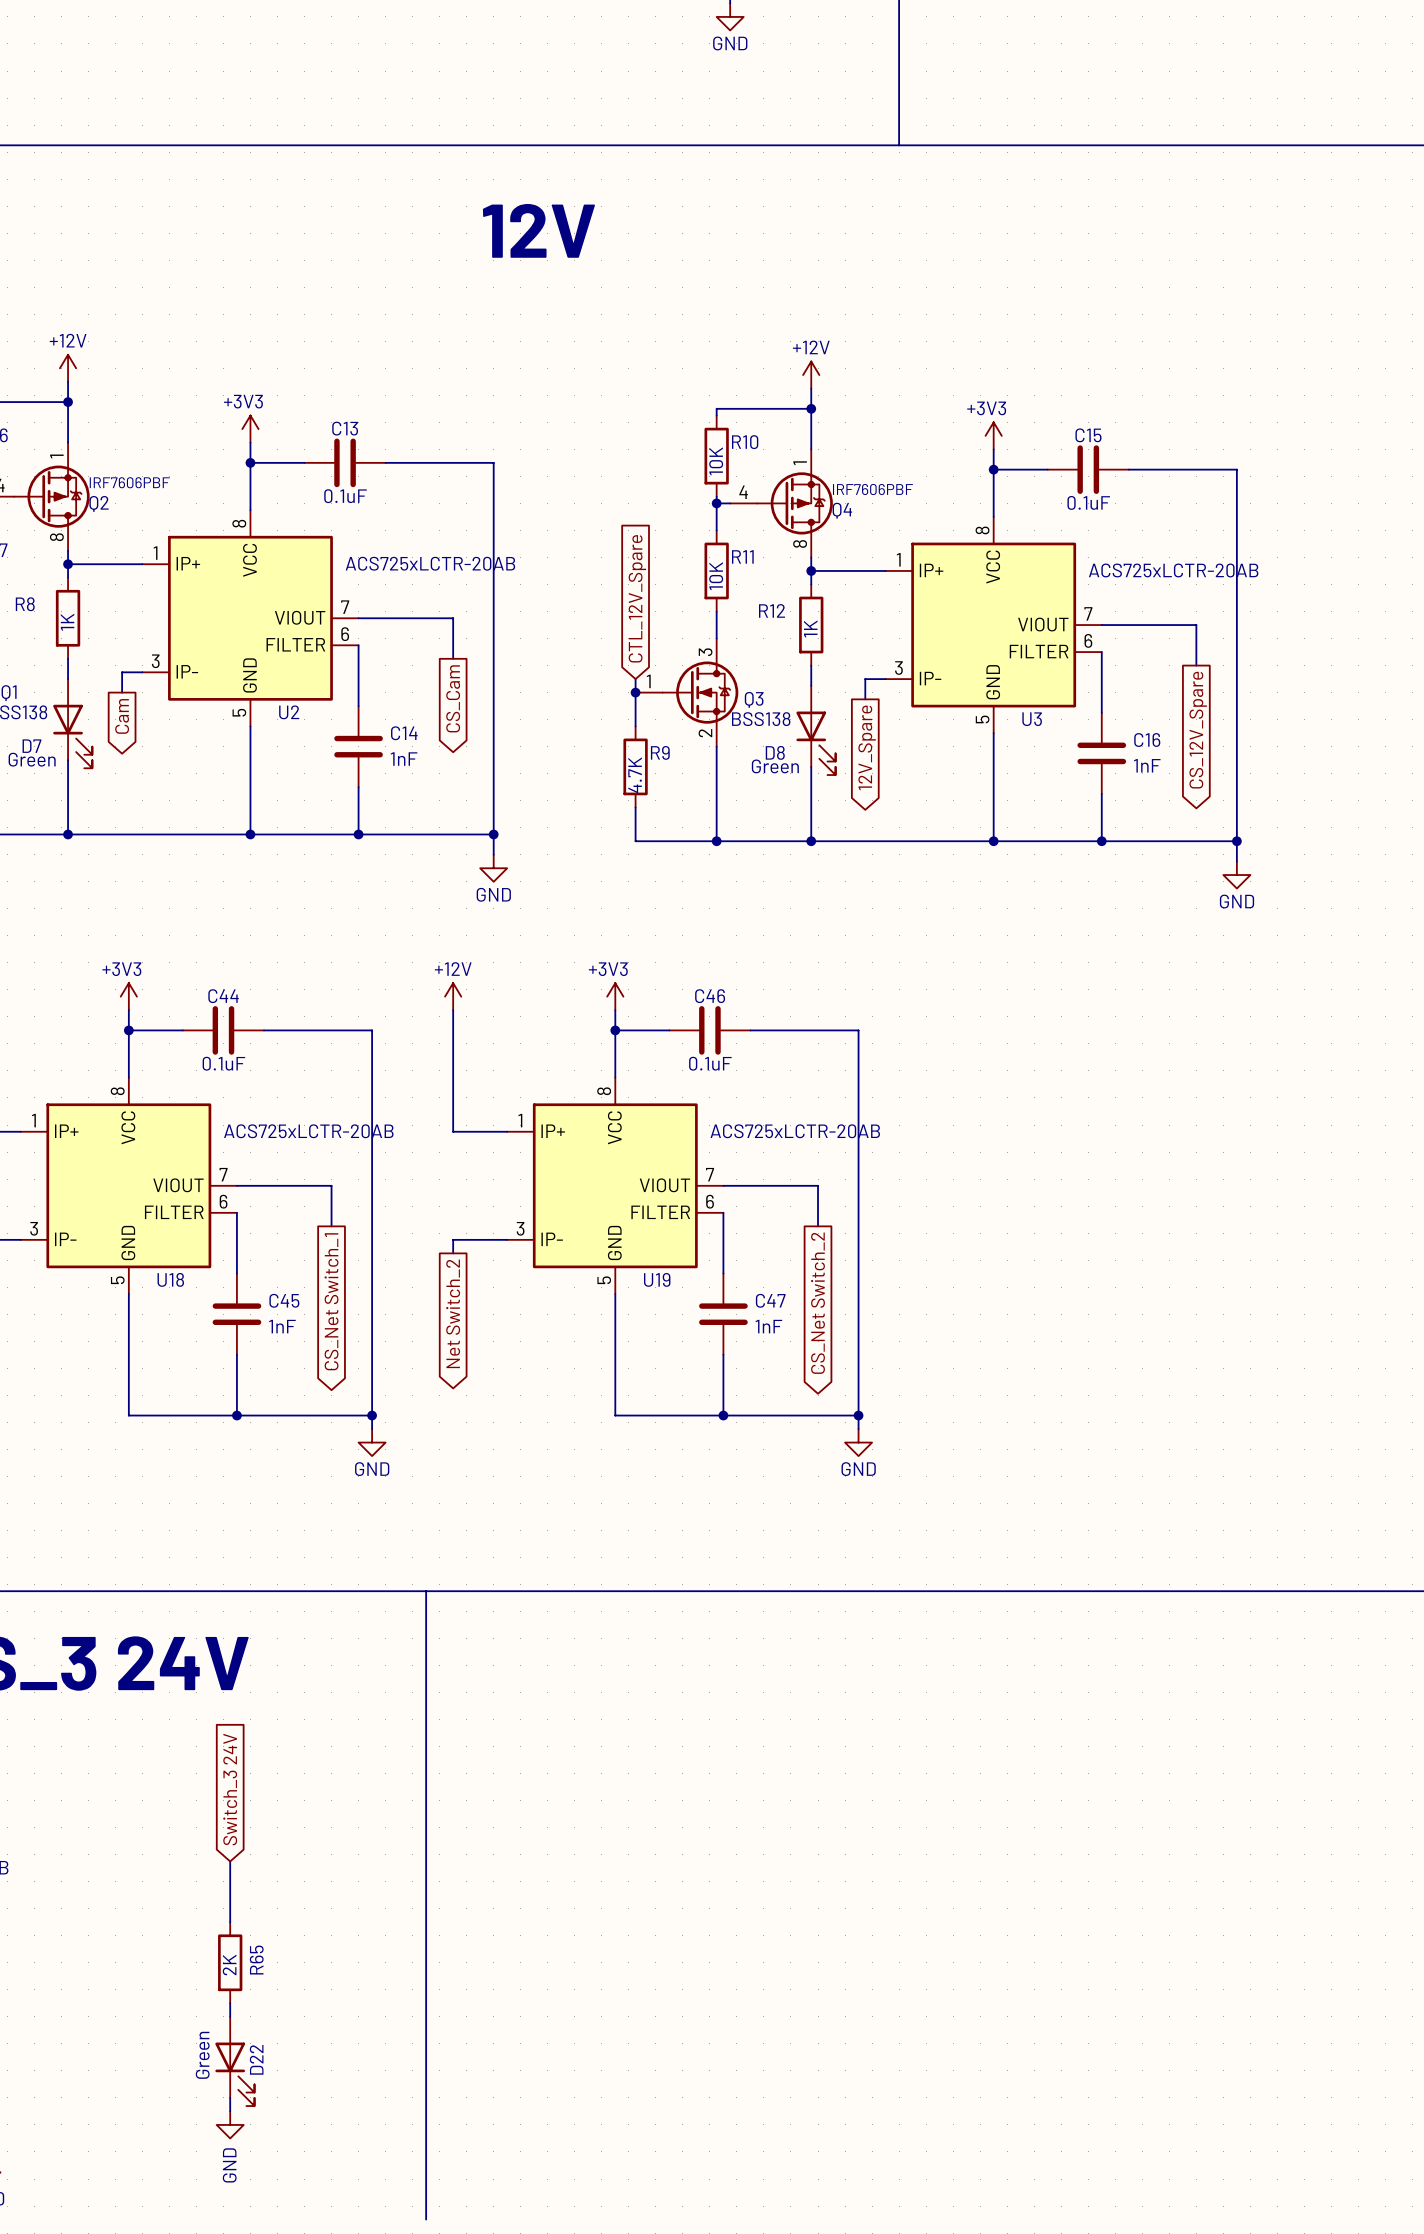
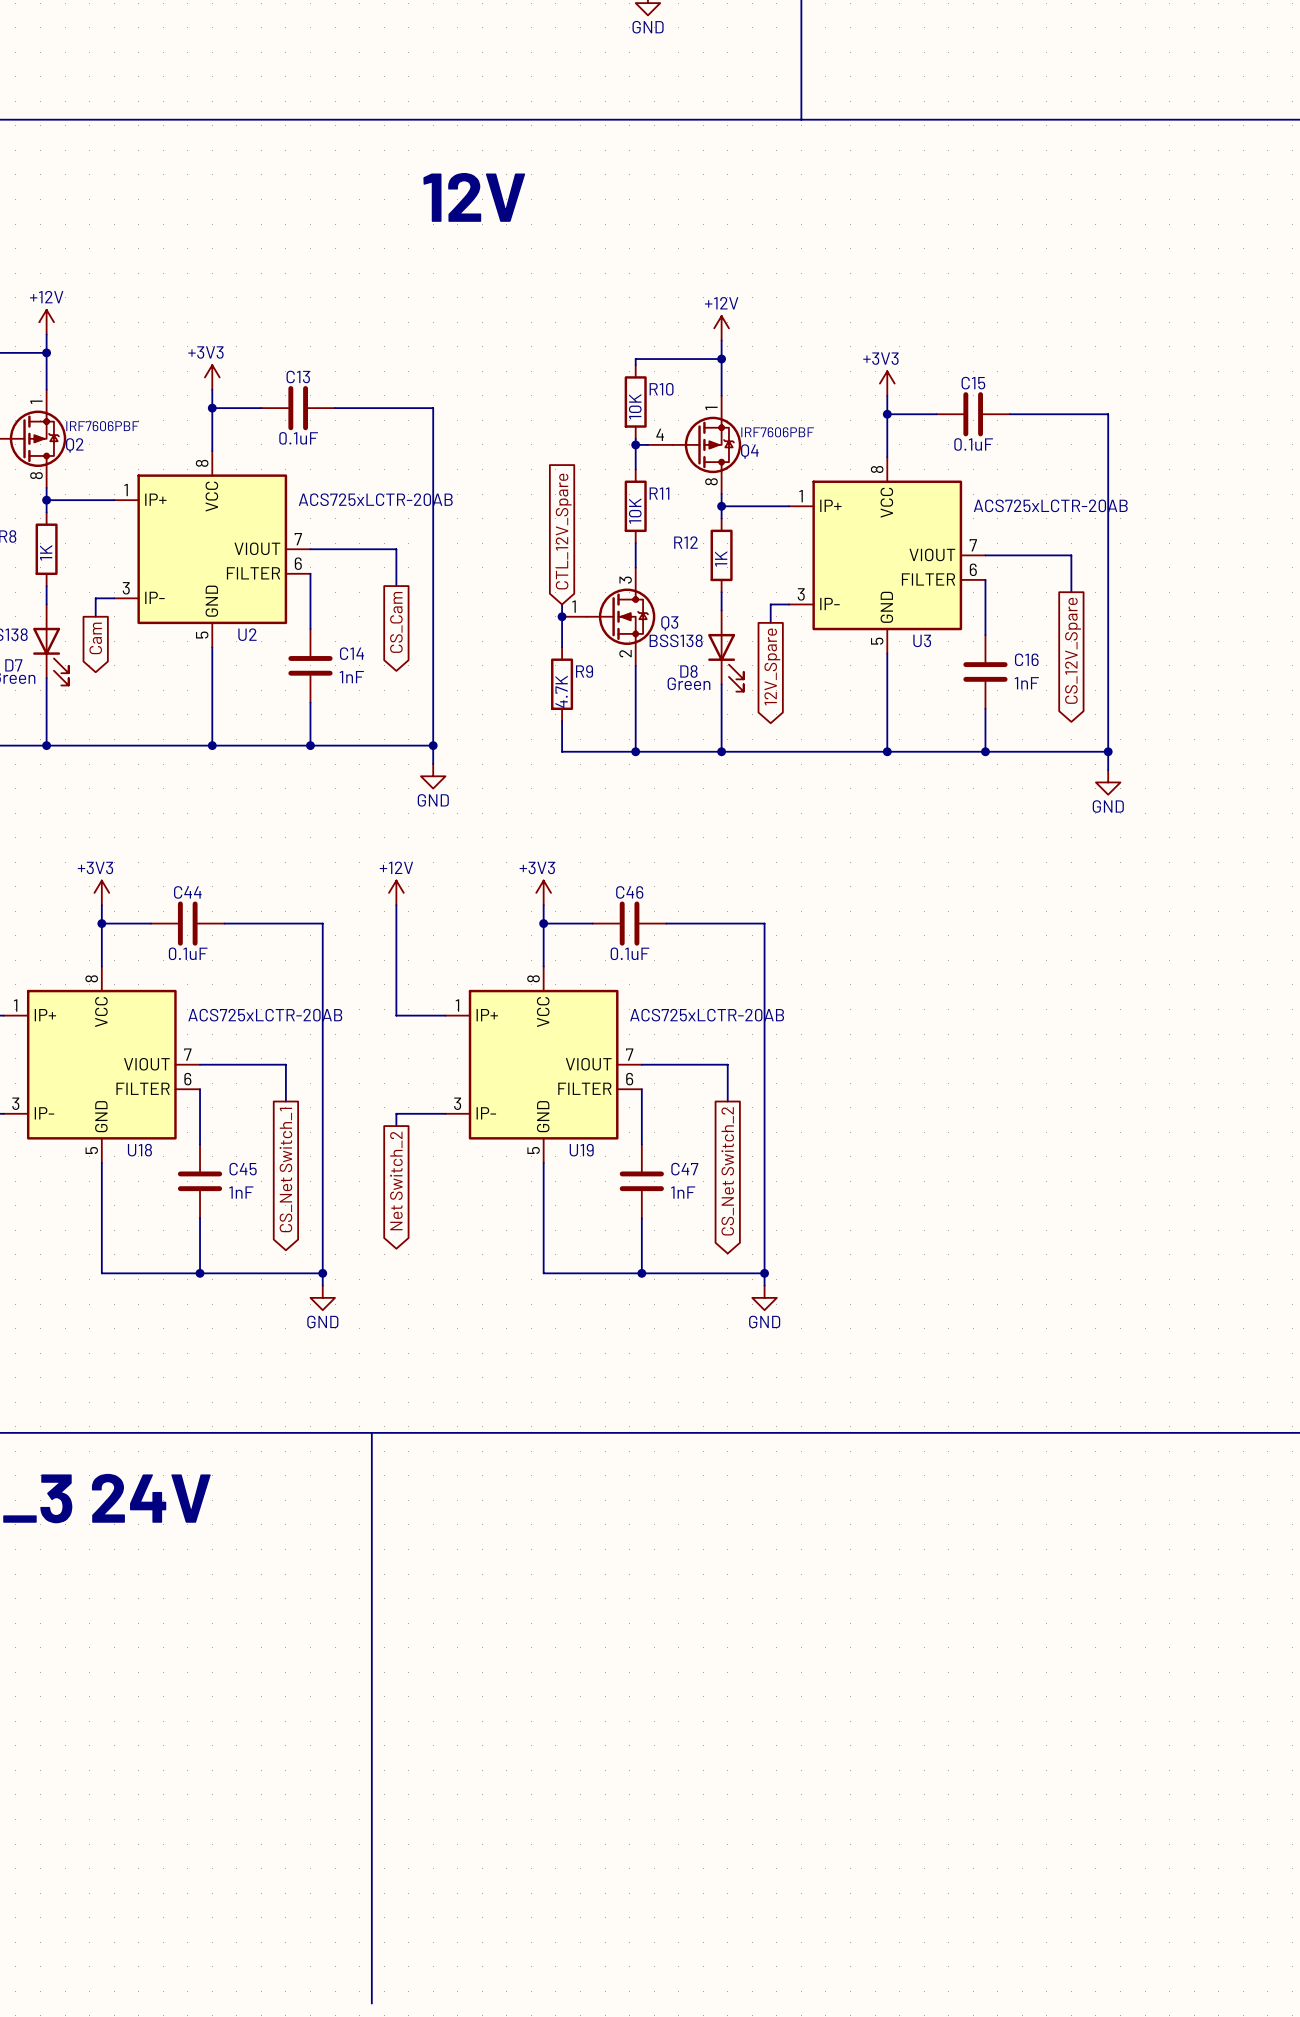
global label: Switch_3 24V (230, 1789) -> none
wire: (230, 1861) (230, 1922) -> none
R65: 2K (230, 1962) -> none
wire: (230, 2003) (230, 2016) -> none
D22: Green (234, 2061) -> none
wire: (230, 2097) (230, 2111) -> none
power symbol: GND (230, 2124) -> none

